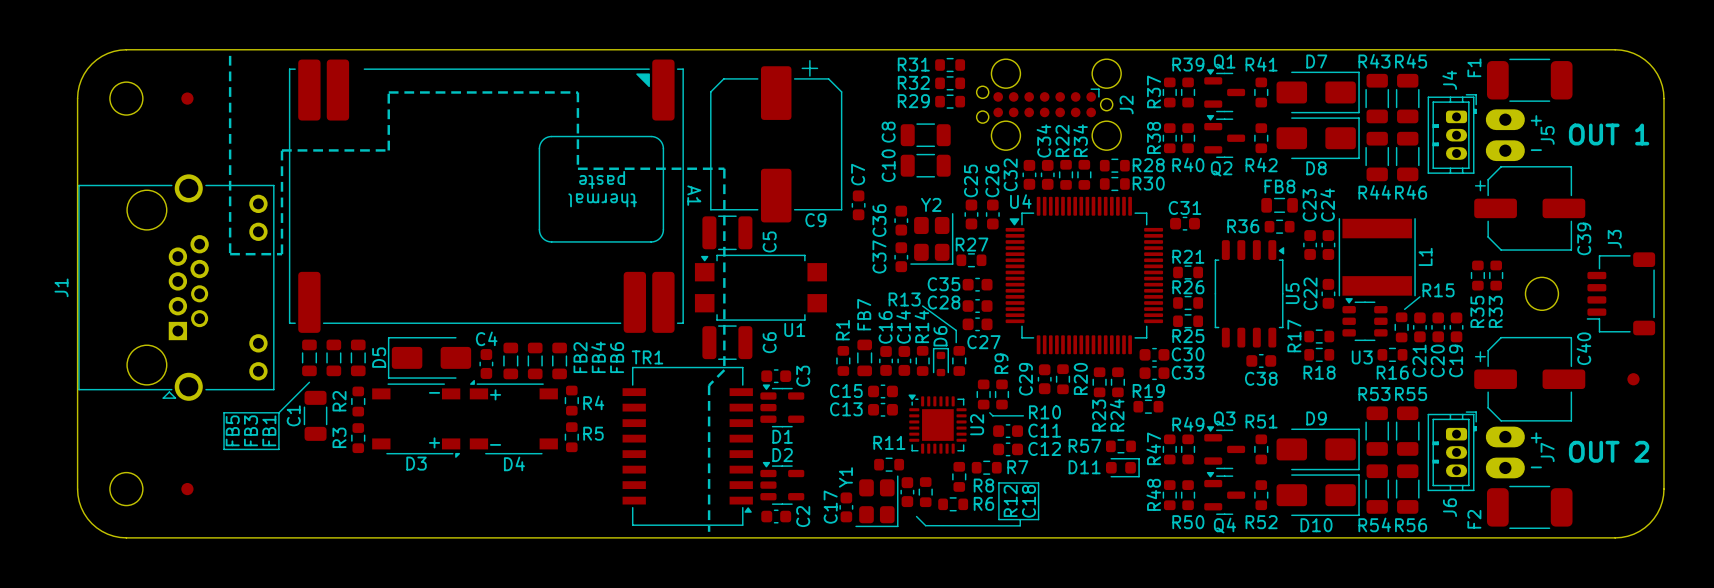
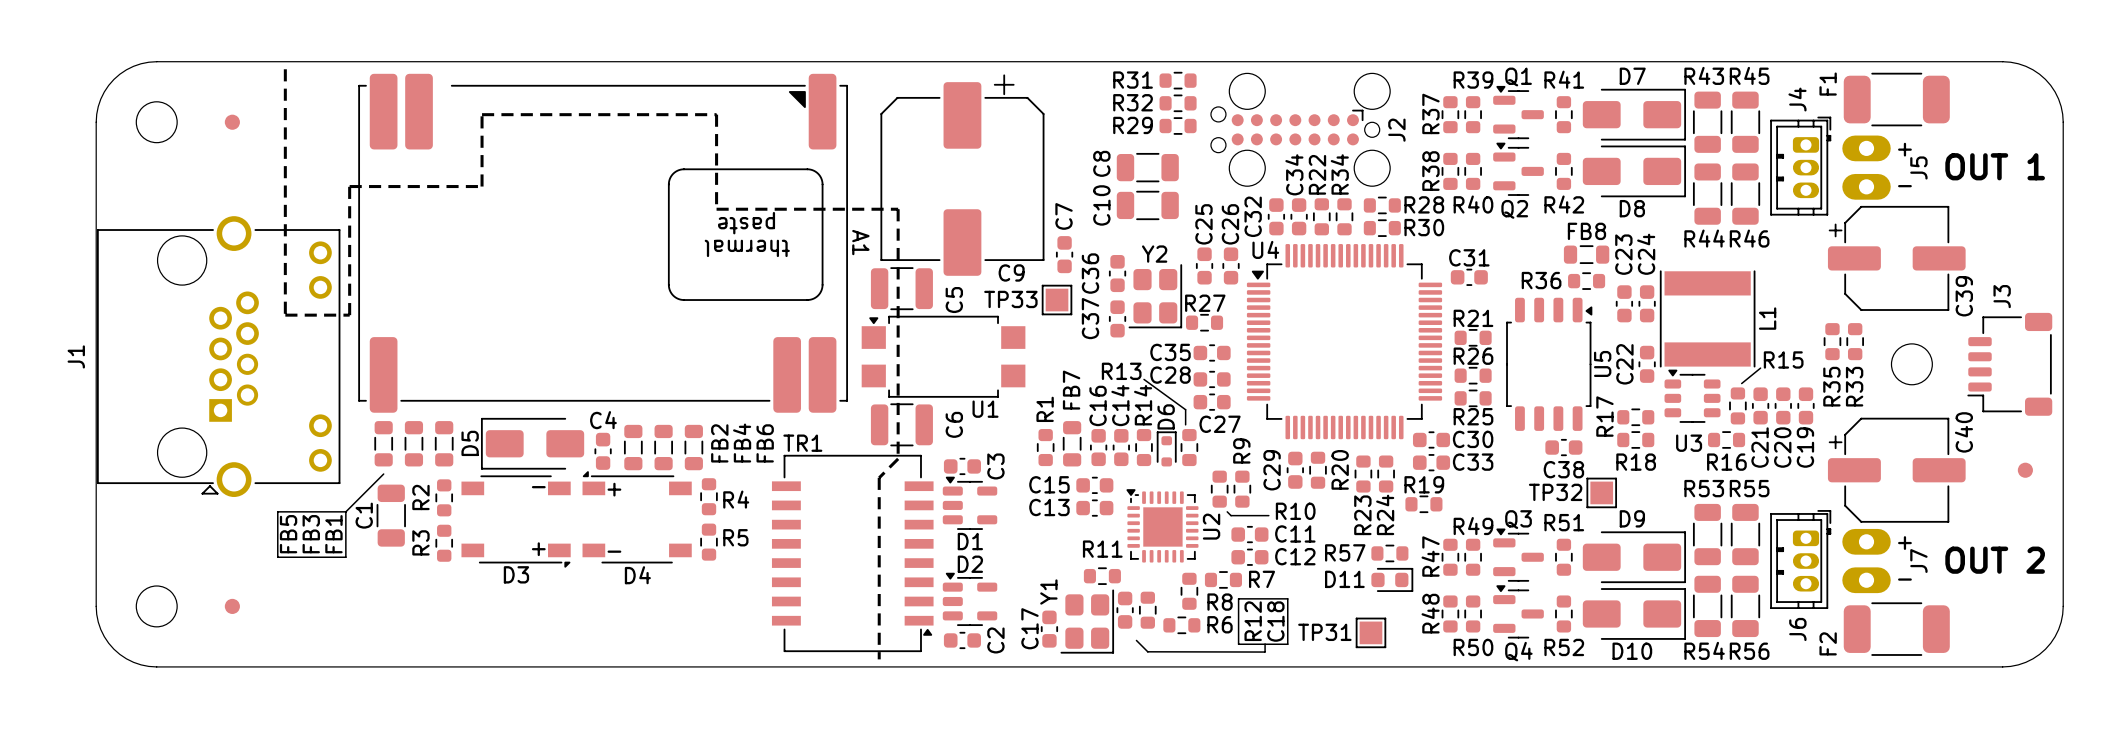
TP33: none -> (1057, 300)
TP32: none -> (1601, 492)
TP31: none -> (1370, 632)

